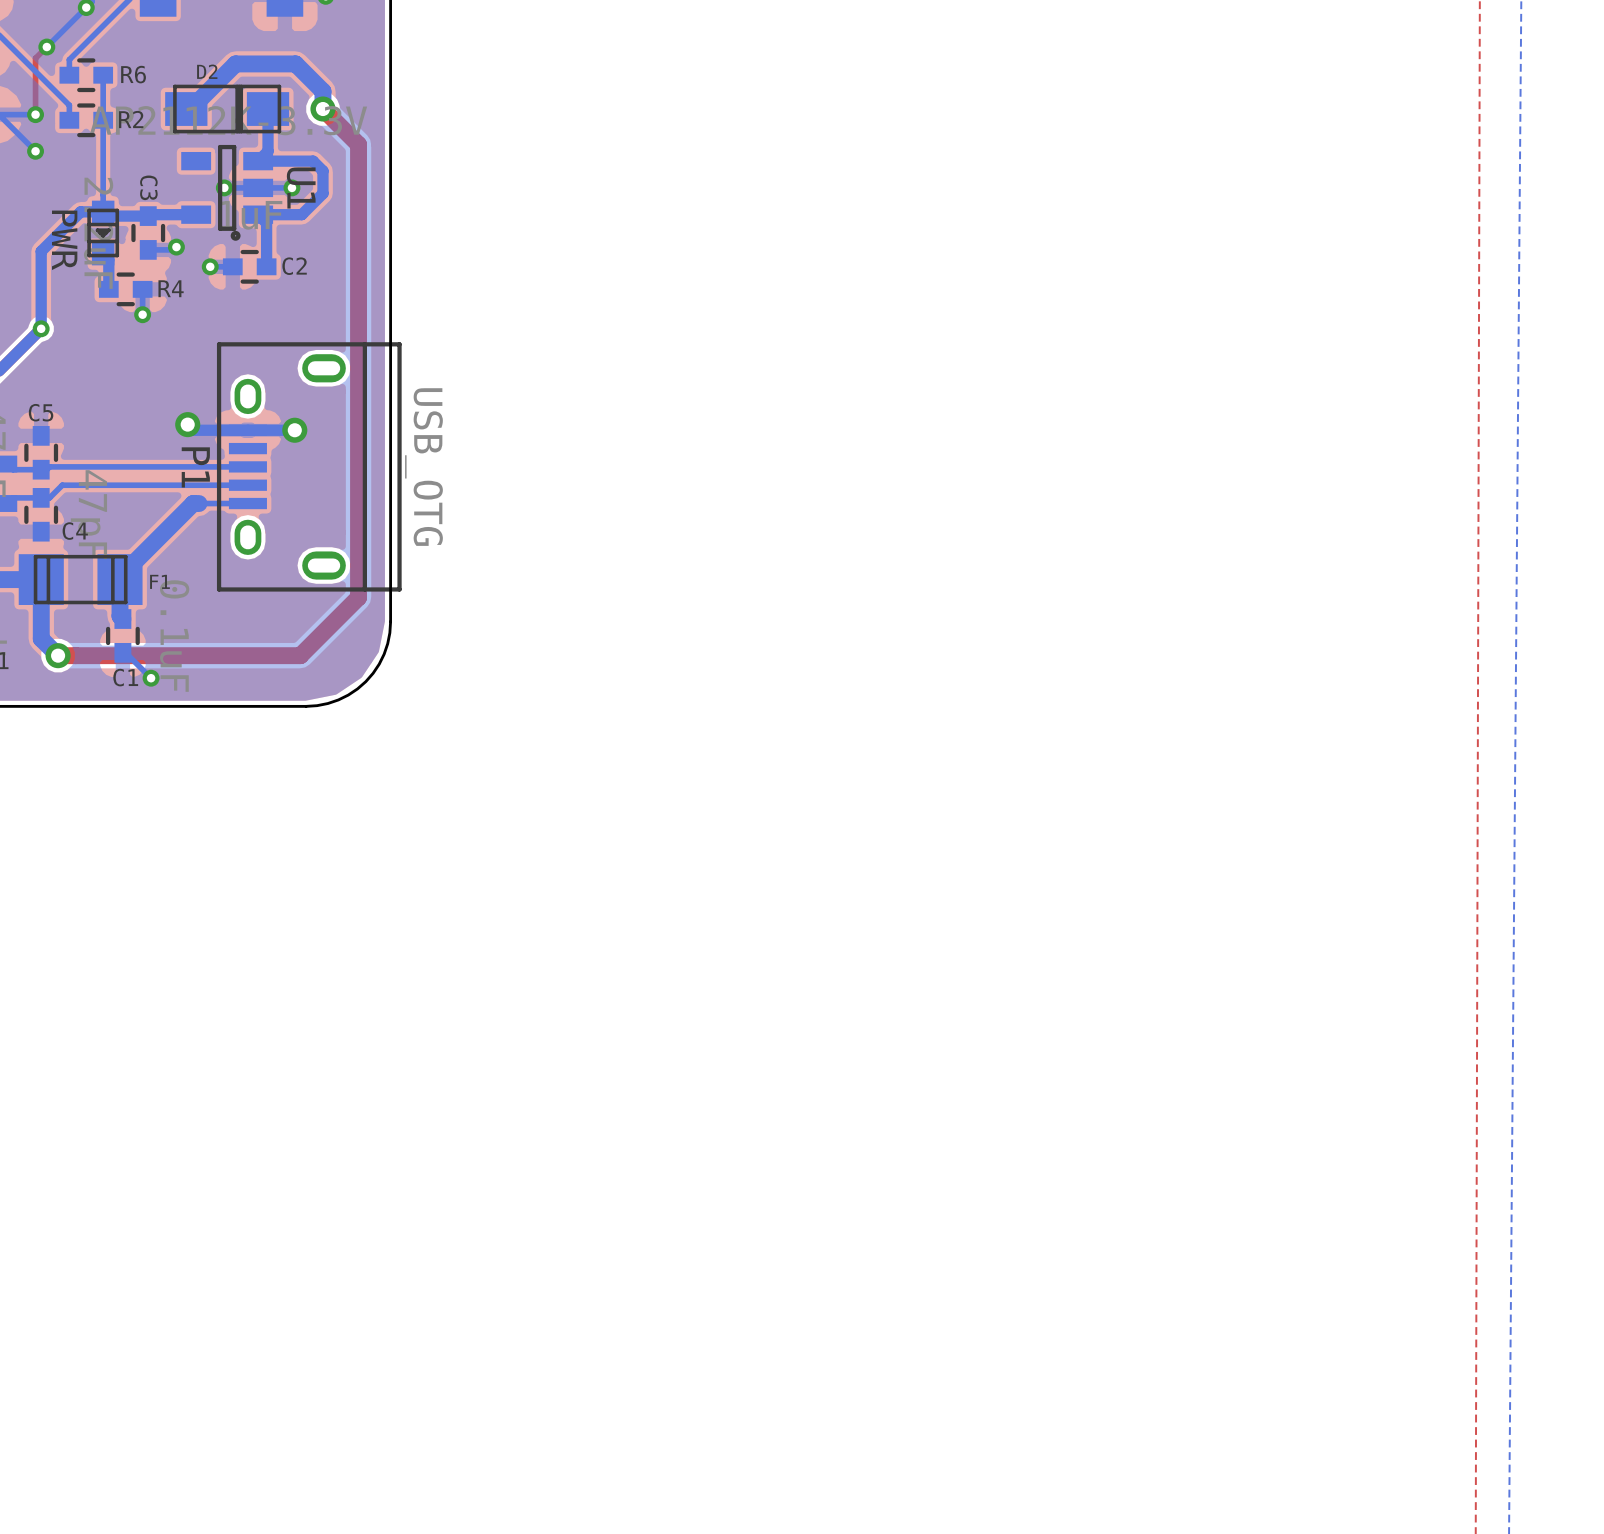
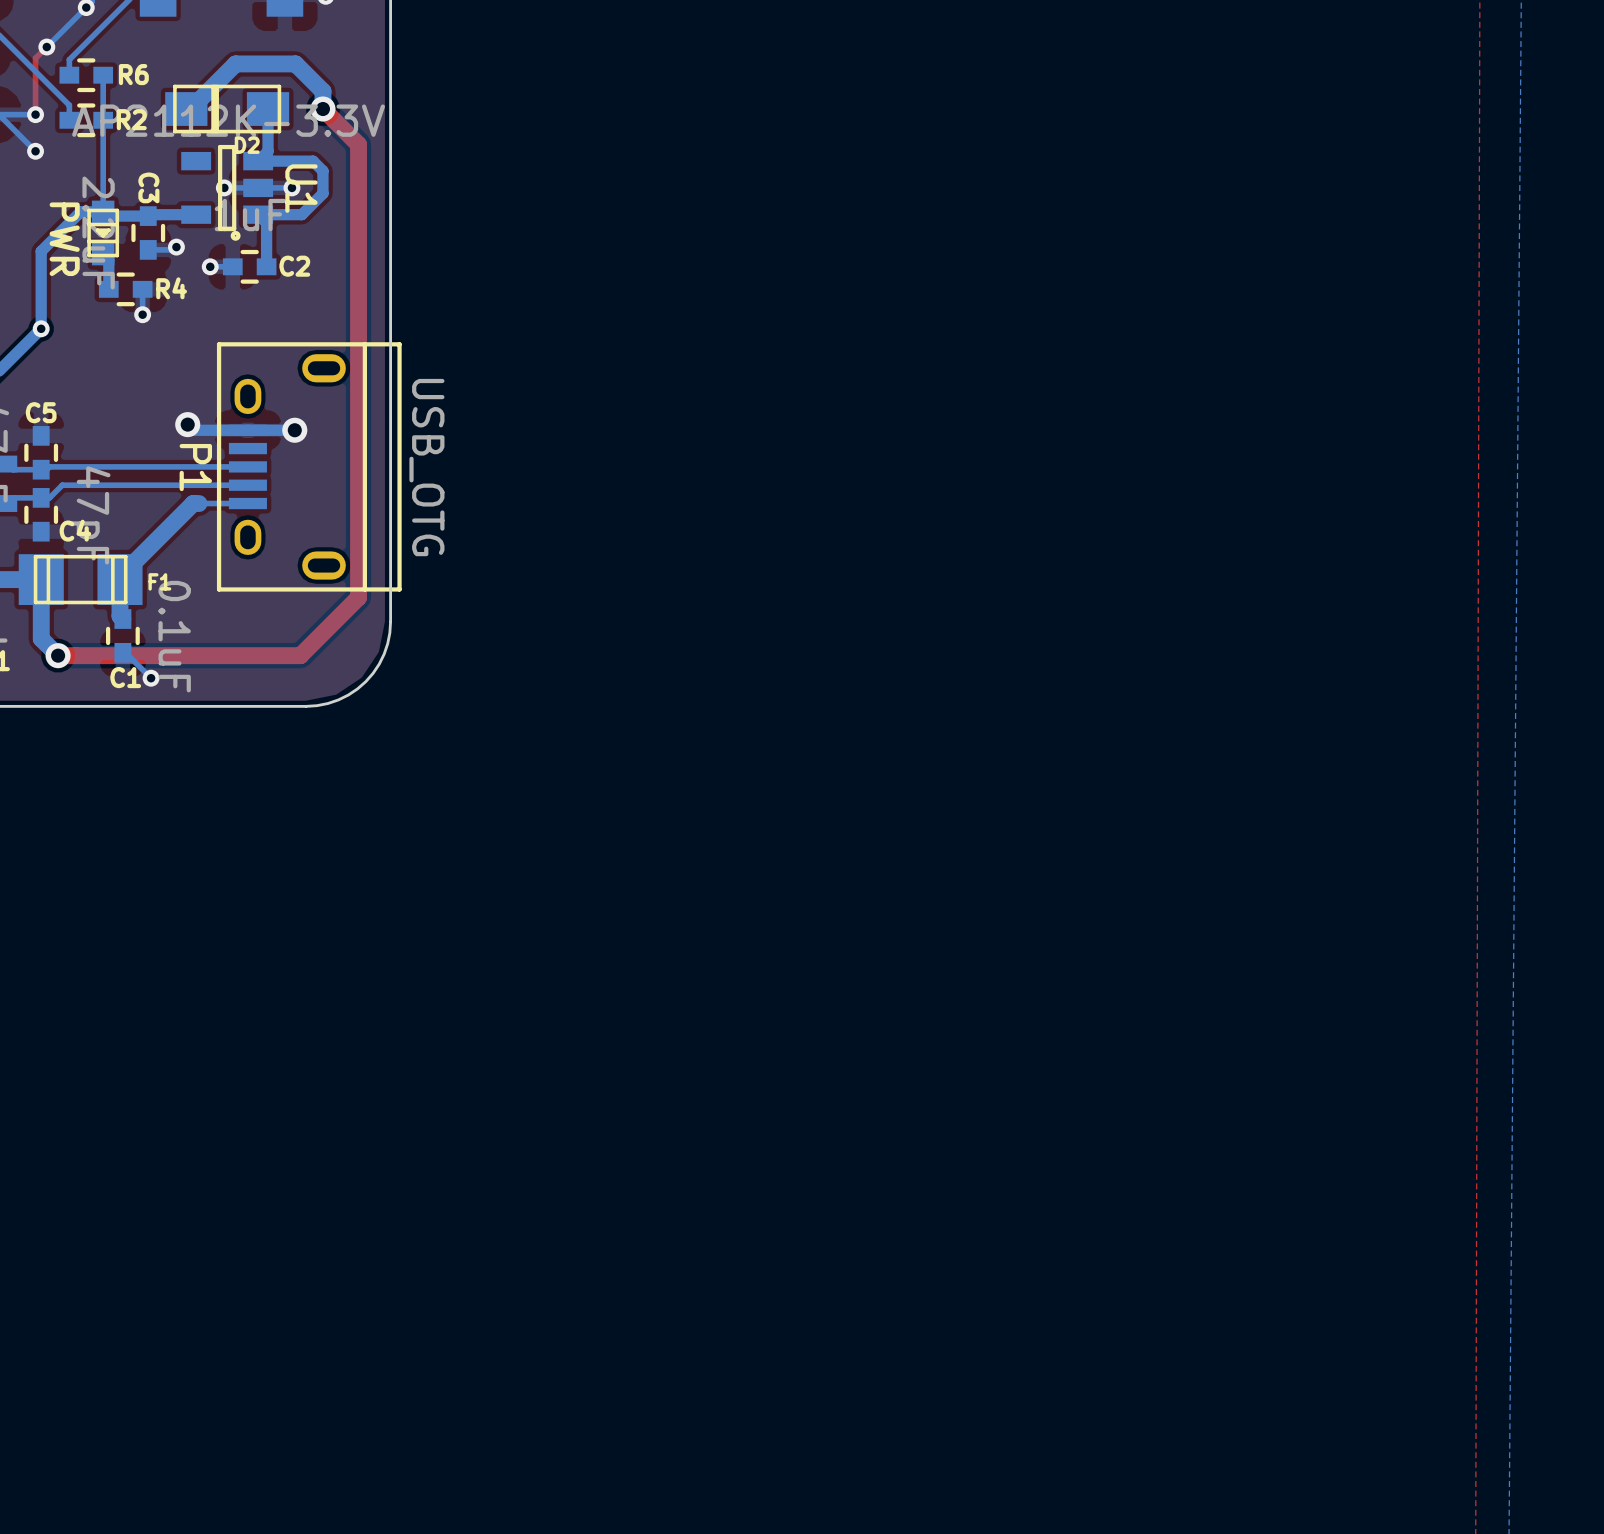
D2 rotation: 0° (227, 109) -> 180° (227, 109)

